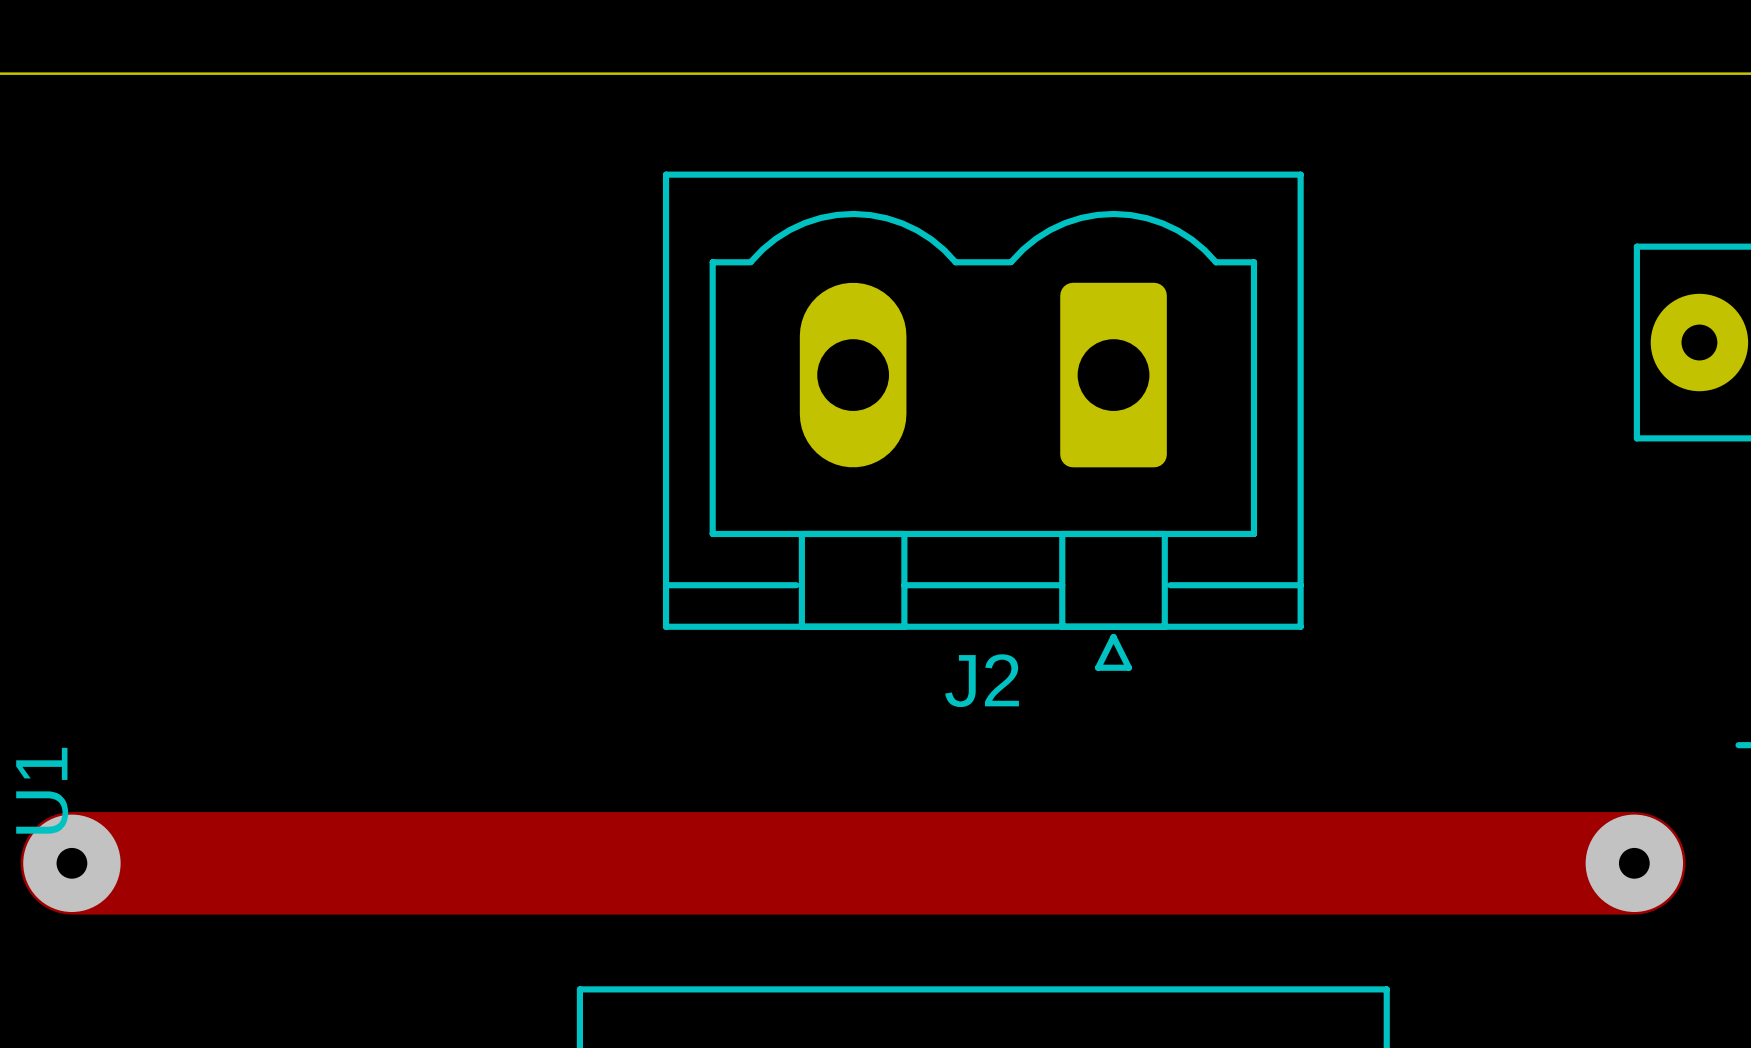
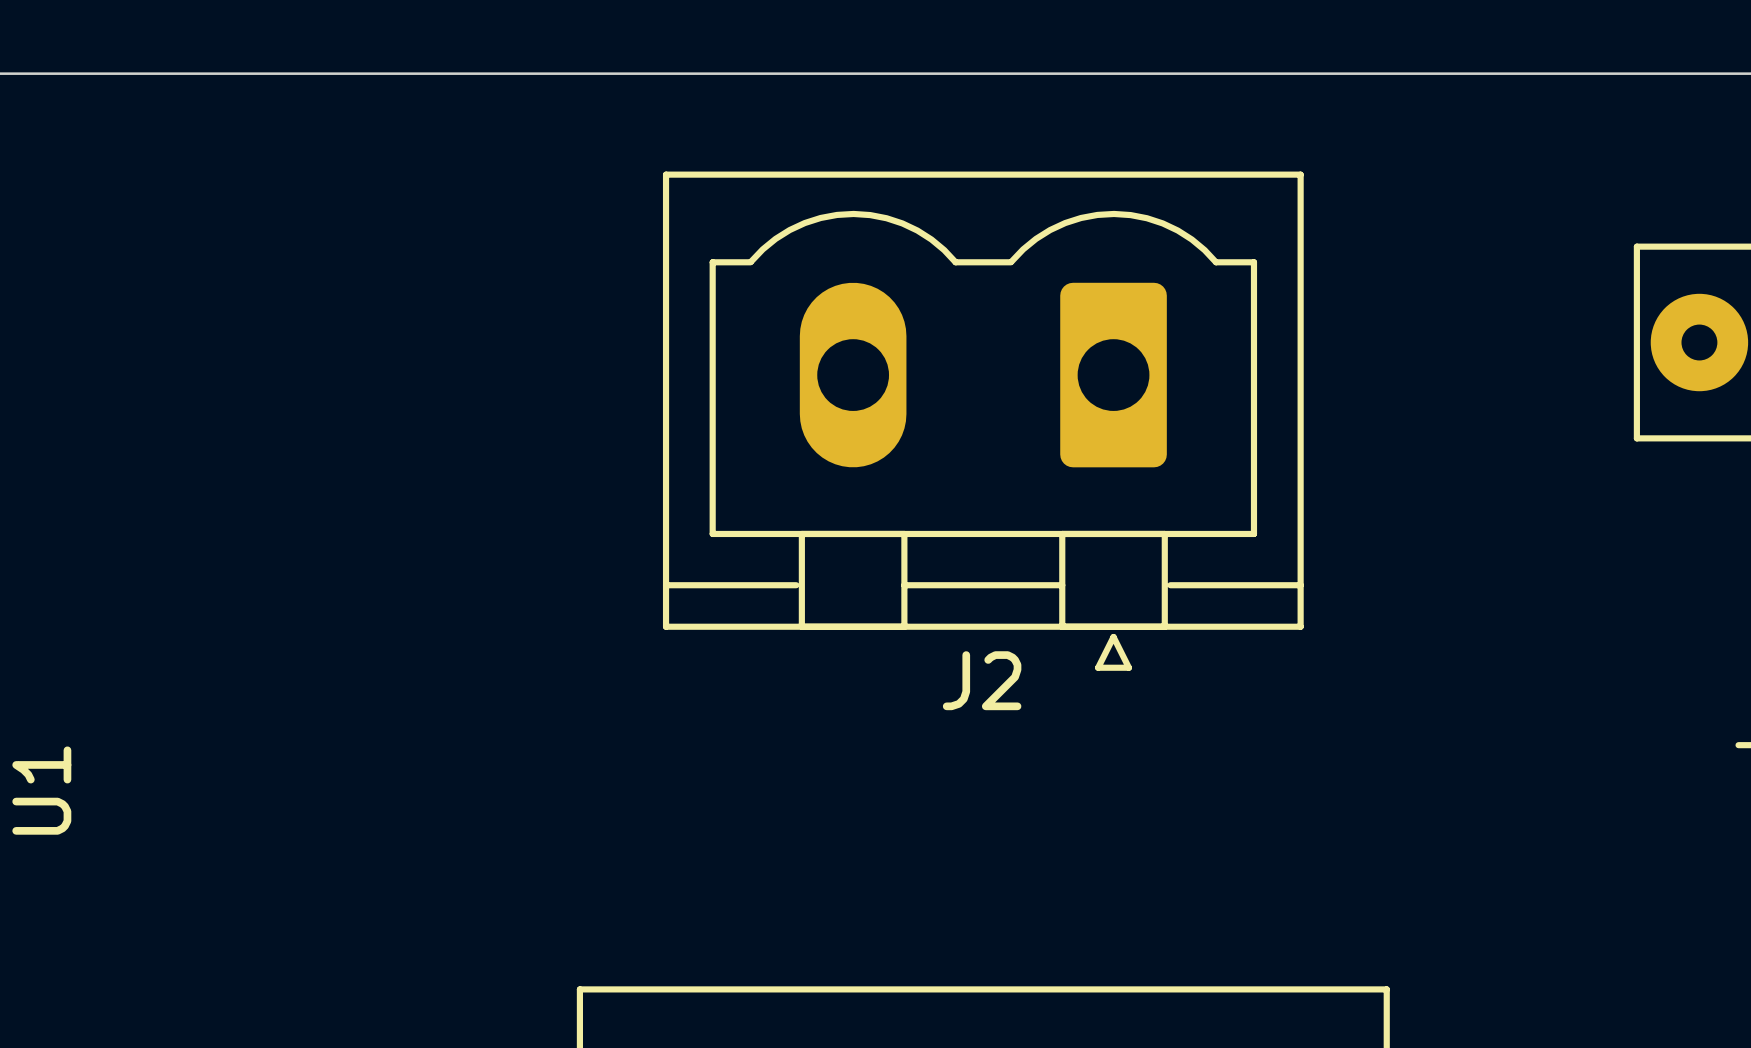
track: (71, 863) (1634, 863) -> none
via: (71, 863) -> none
via: (1634, 863) -> none

